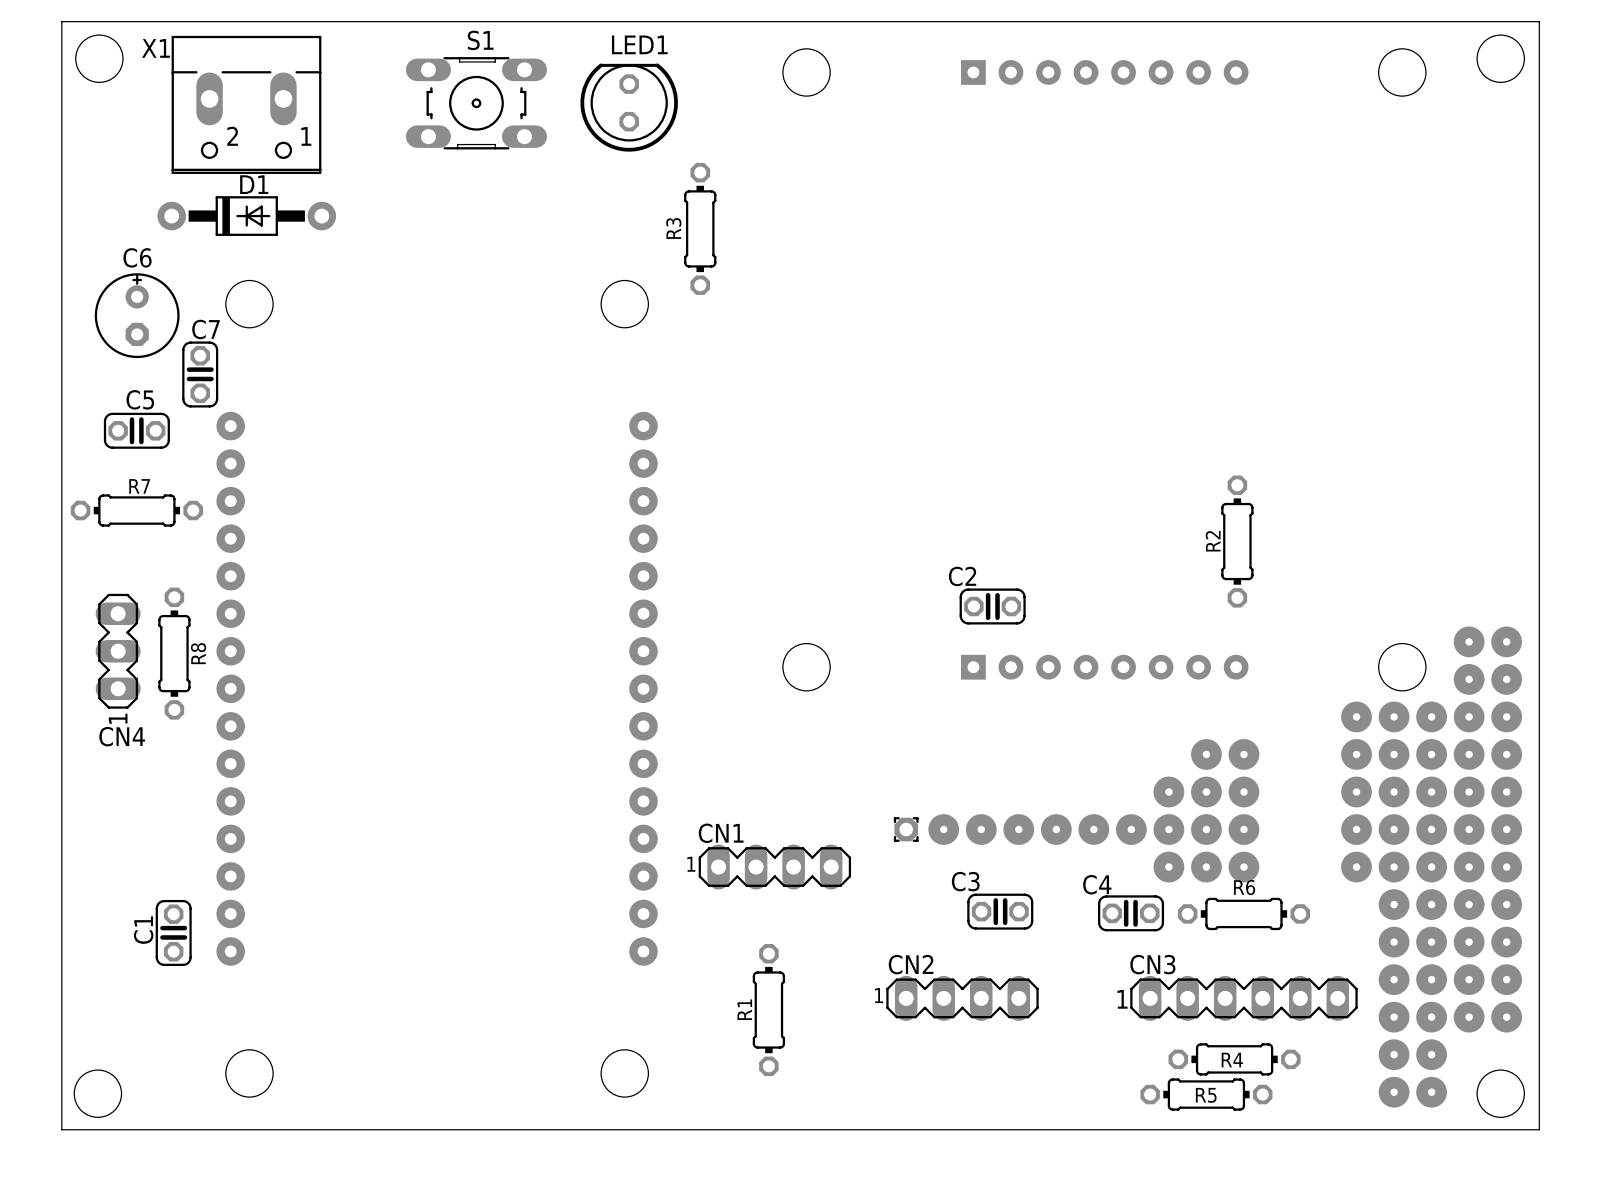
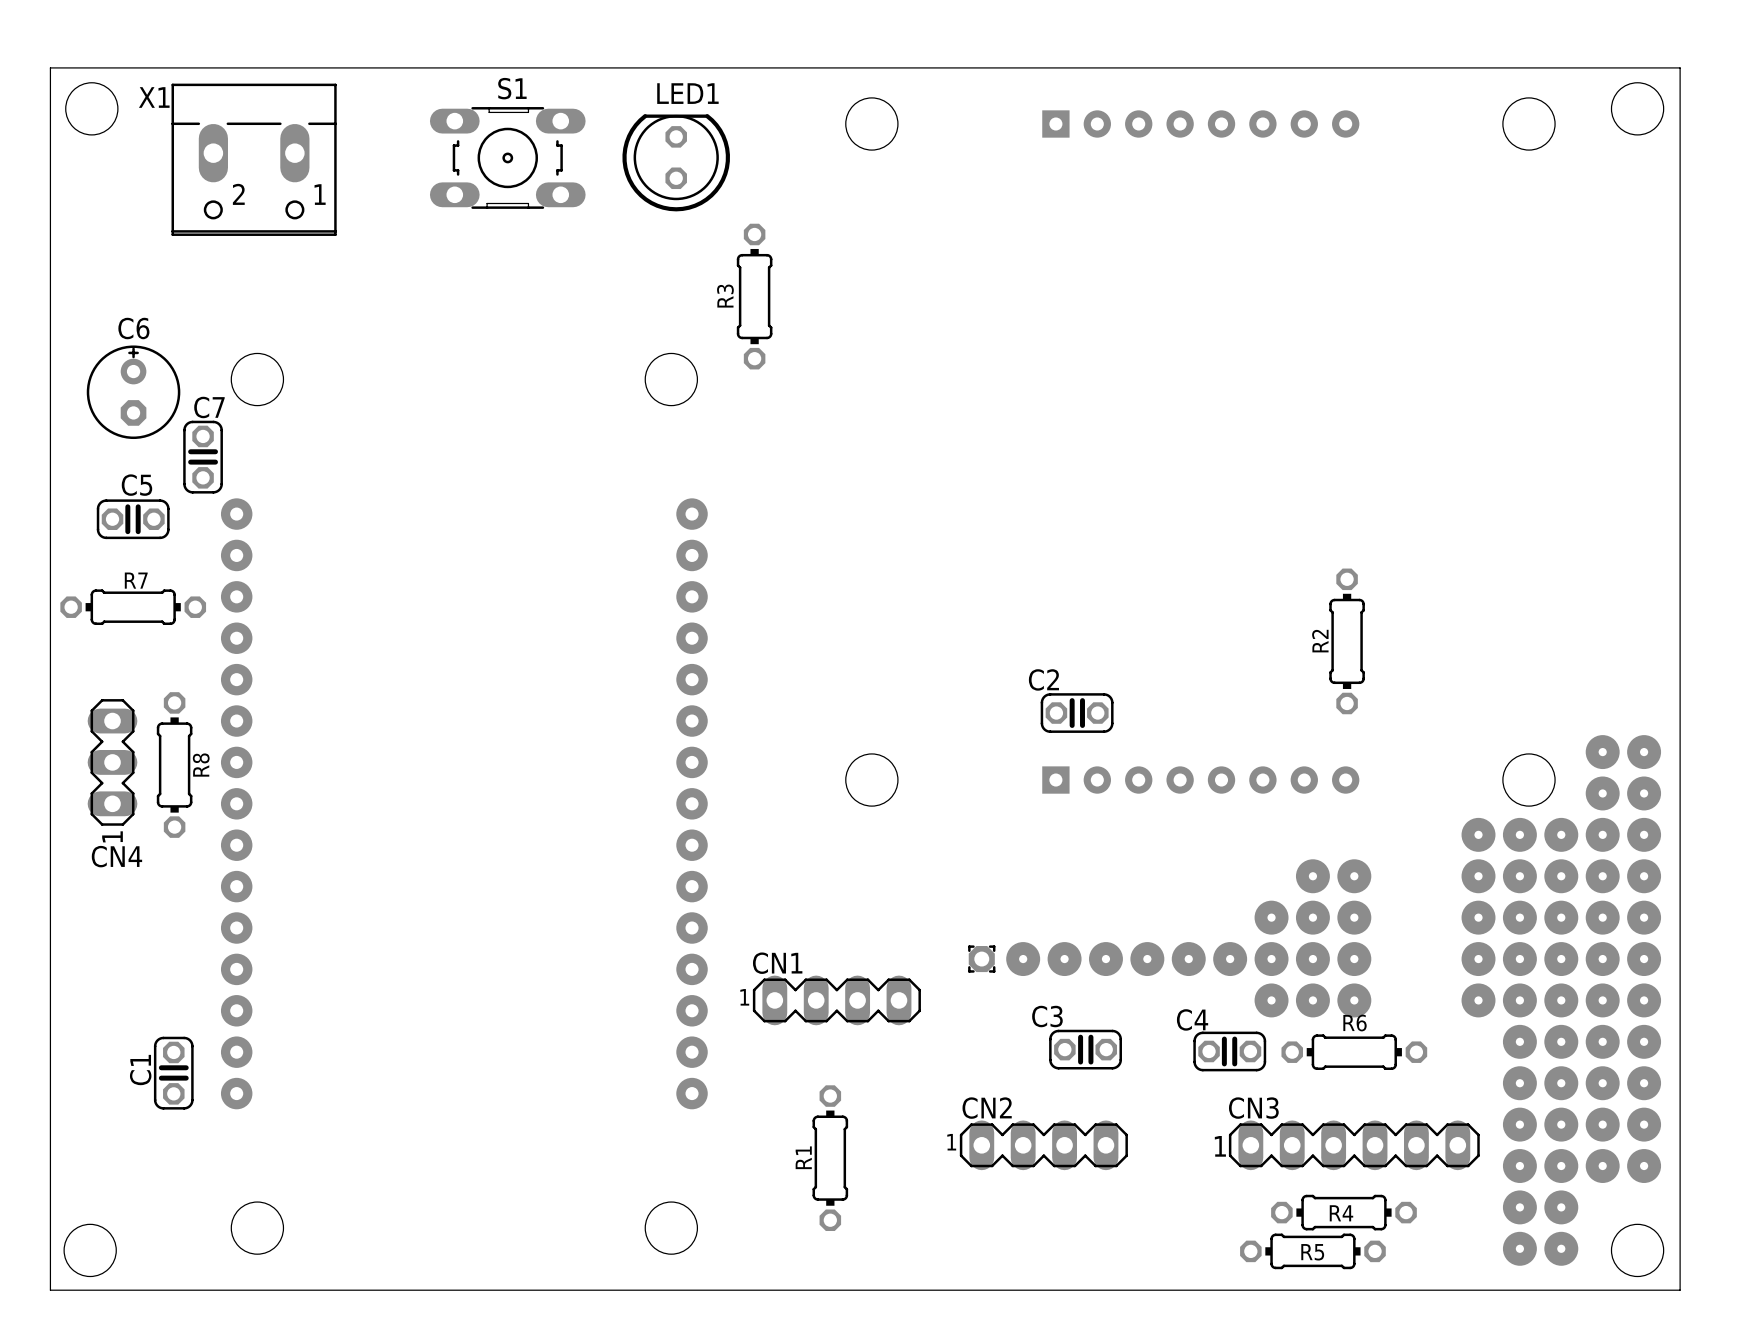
D1: (246, 216) -> none

